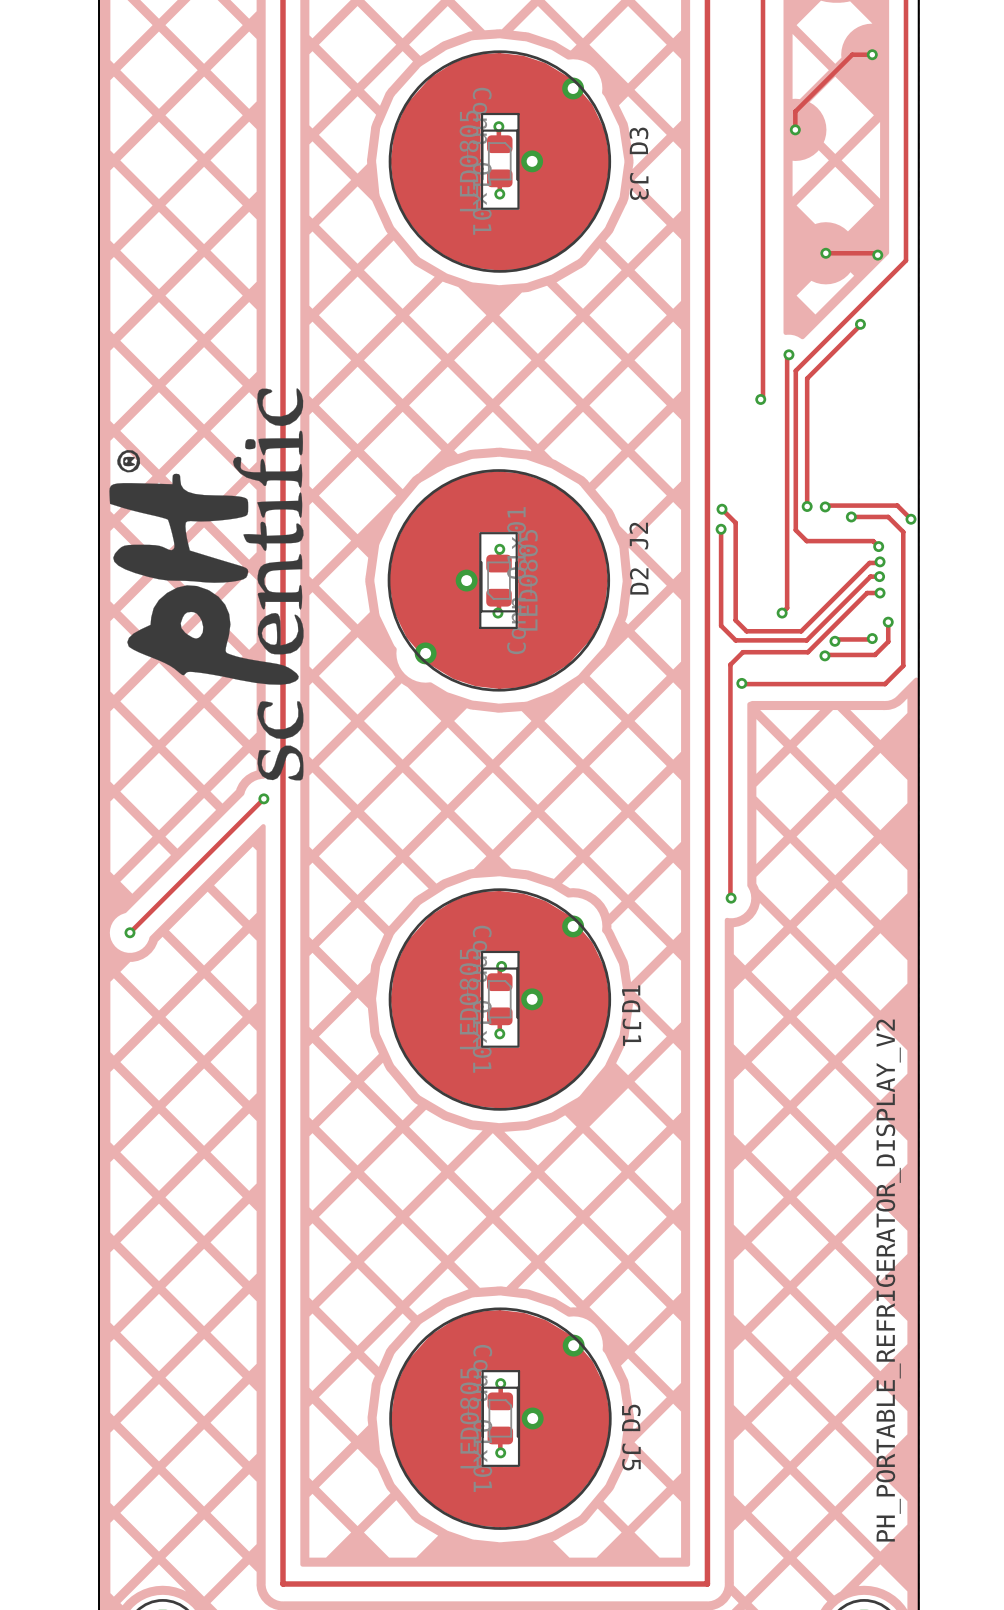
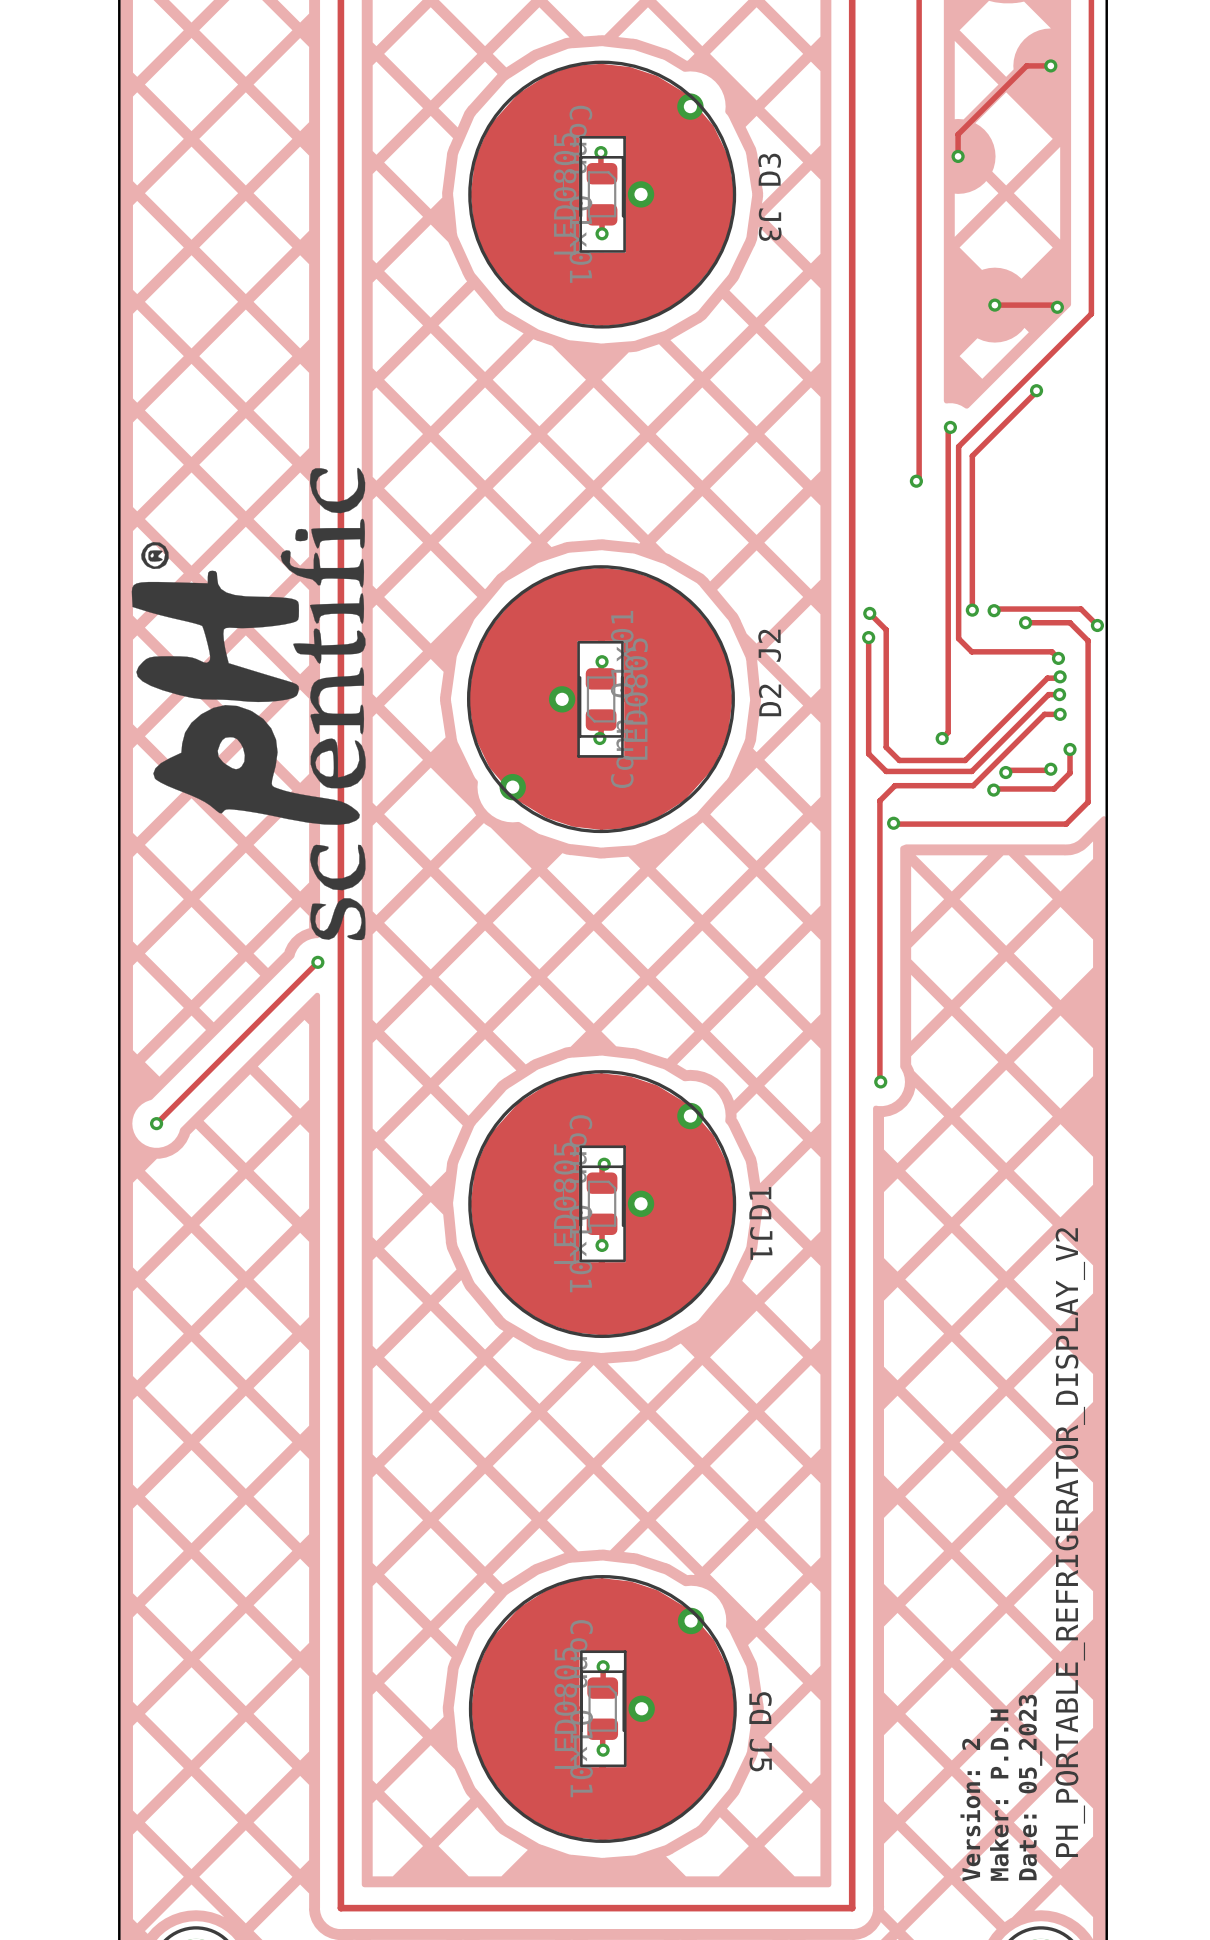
text: none -> Date: 05_2023 (1030, 1787)
text: none -> Maker: P.D.H (999, 1795)
text: none -> Version: 2 (970, 1809)

